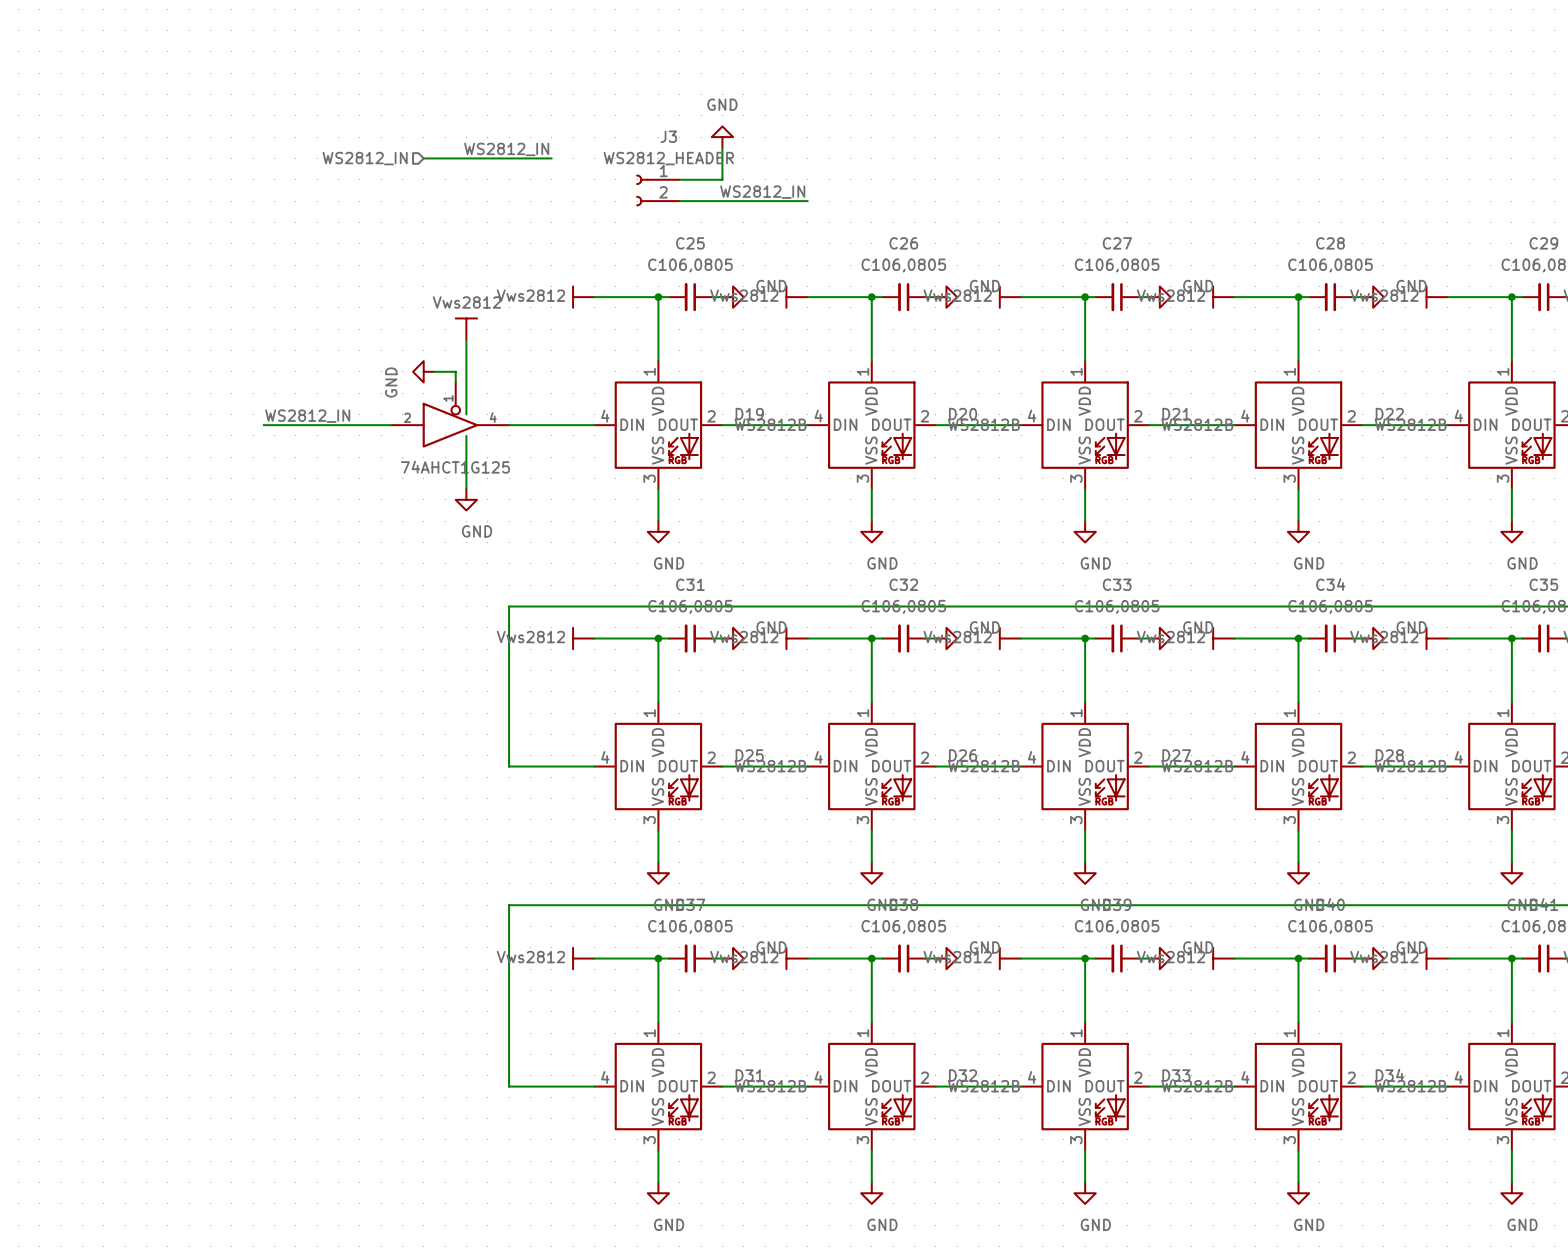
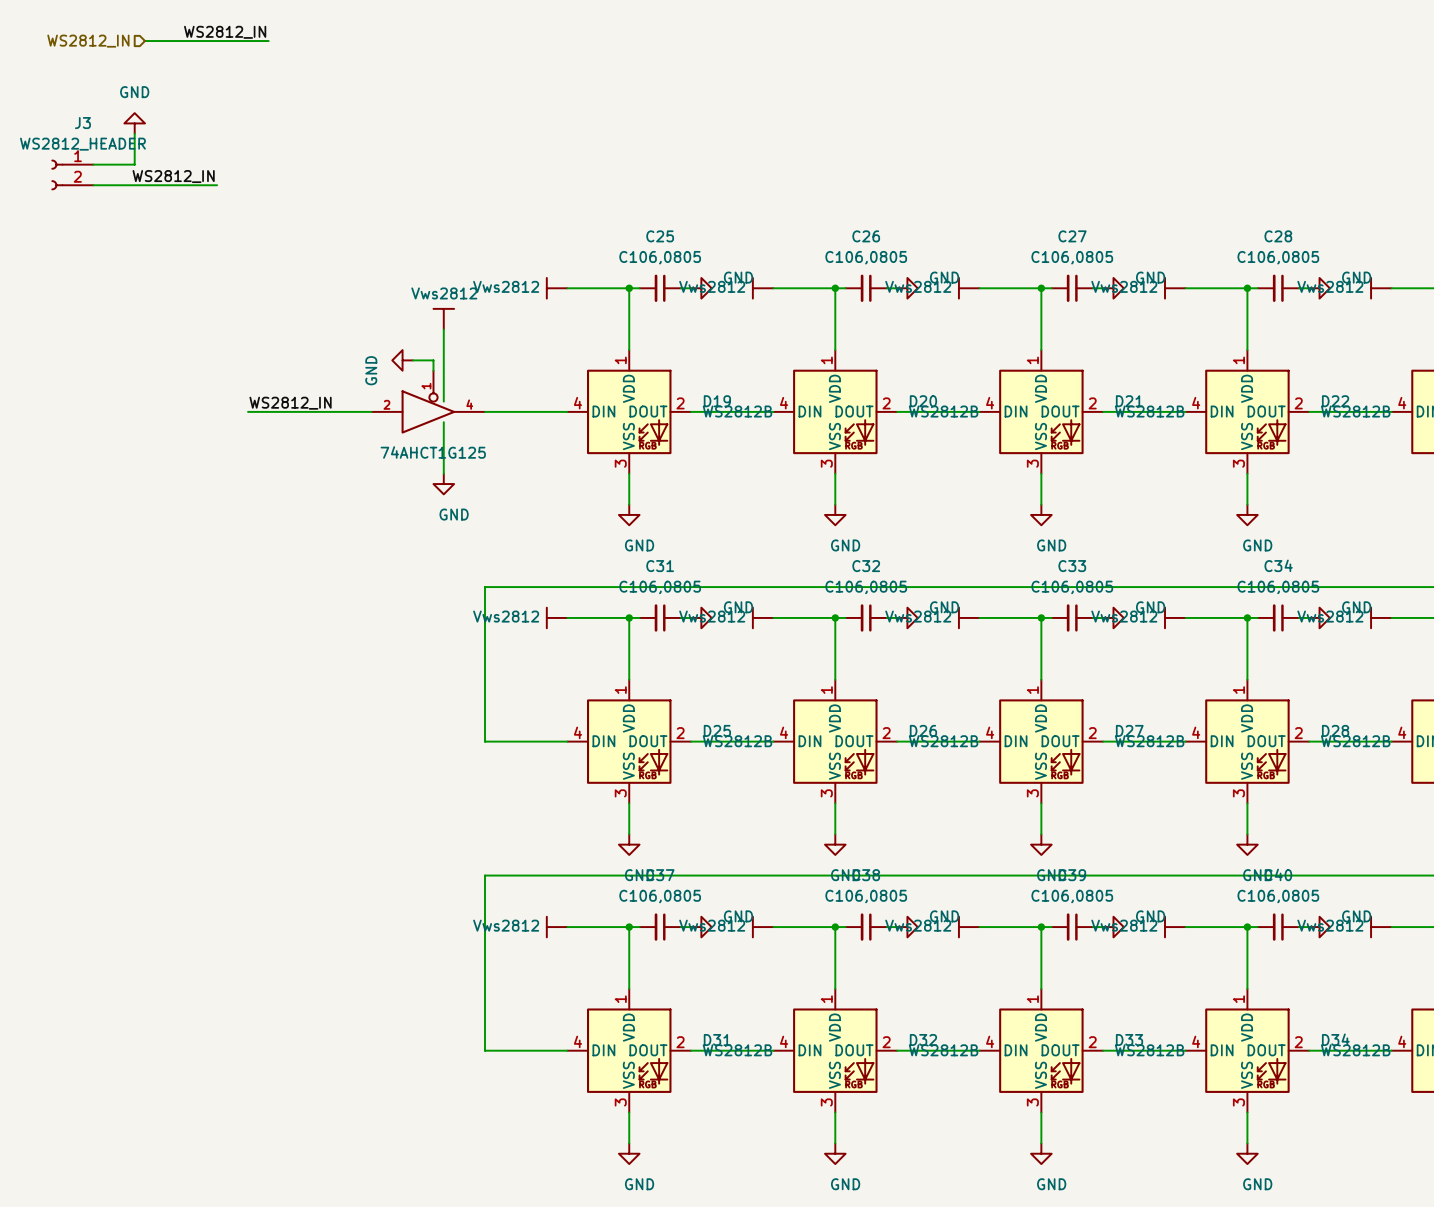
label: none -> WS2812_IN (225, 32)
hierarchical label: none -> WS2812_IN (88, 41)
wire: none -> (145, 41) (268, 41)
power symbol: none -> GND (134, 123)
wire: none -> (134, 133) (134, 164) (93, 164)
power symbol: GND (722, 137) -> none
wire: (722, 147) (722, 179) (679, 179) -> none
label: WS2812_IN (506, 149) -> none
hierarchical label: WS2812_IN (365, 158) -> none
wire: (423, 158) (551, 158) -> none
label: none -> WS2812_IN (173, 176)
wire: none -> (93, 185) (217, 185)
J3 position: (658, 190) -> (72, 174)
label: WS2812_IN (762, 192) -> none
wire: (679, 201) (807, 201) -> none

